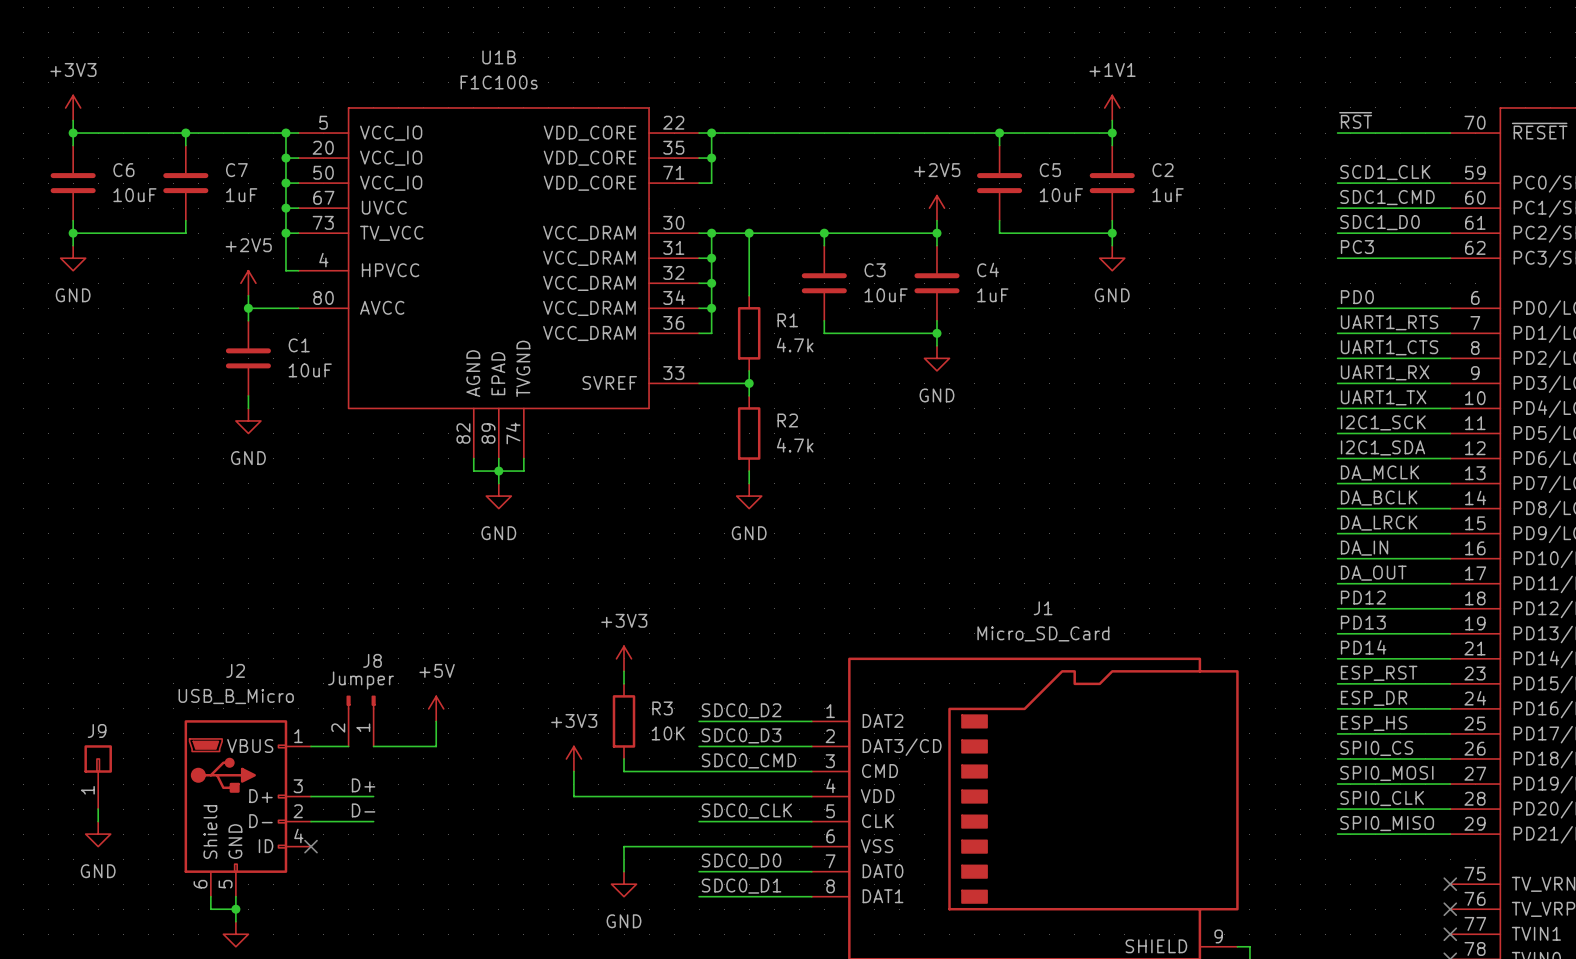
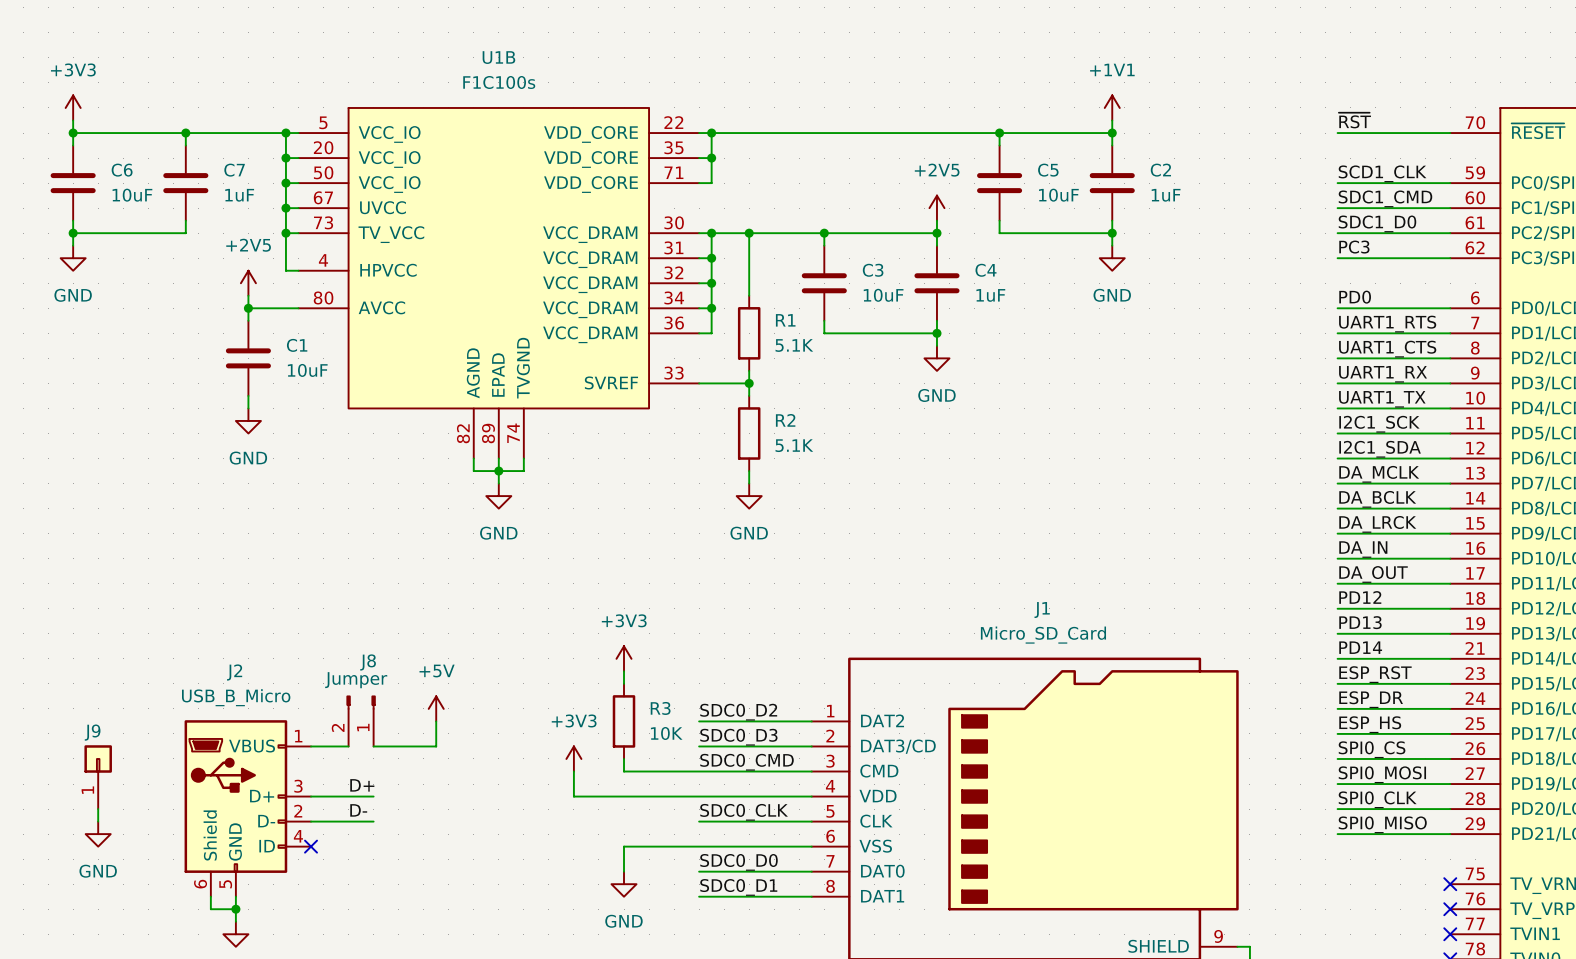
R1 value: 4.7k (795, 345) -> 5.1K (794, 345)
R2 value: 4.7k (795, 445) -> 5.1K (794, 445)

